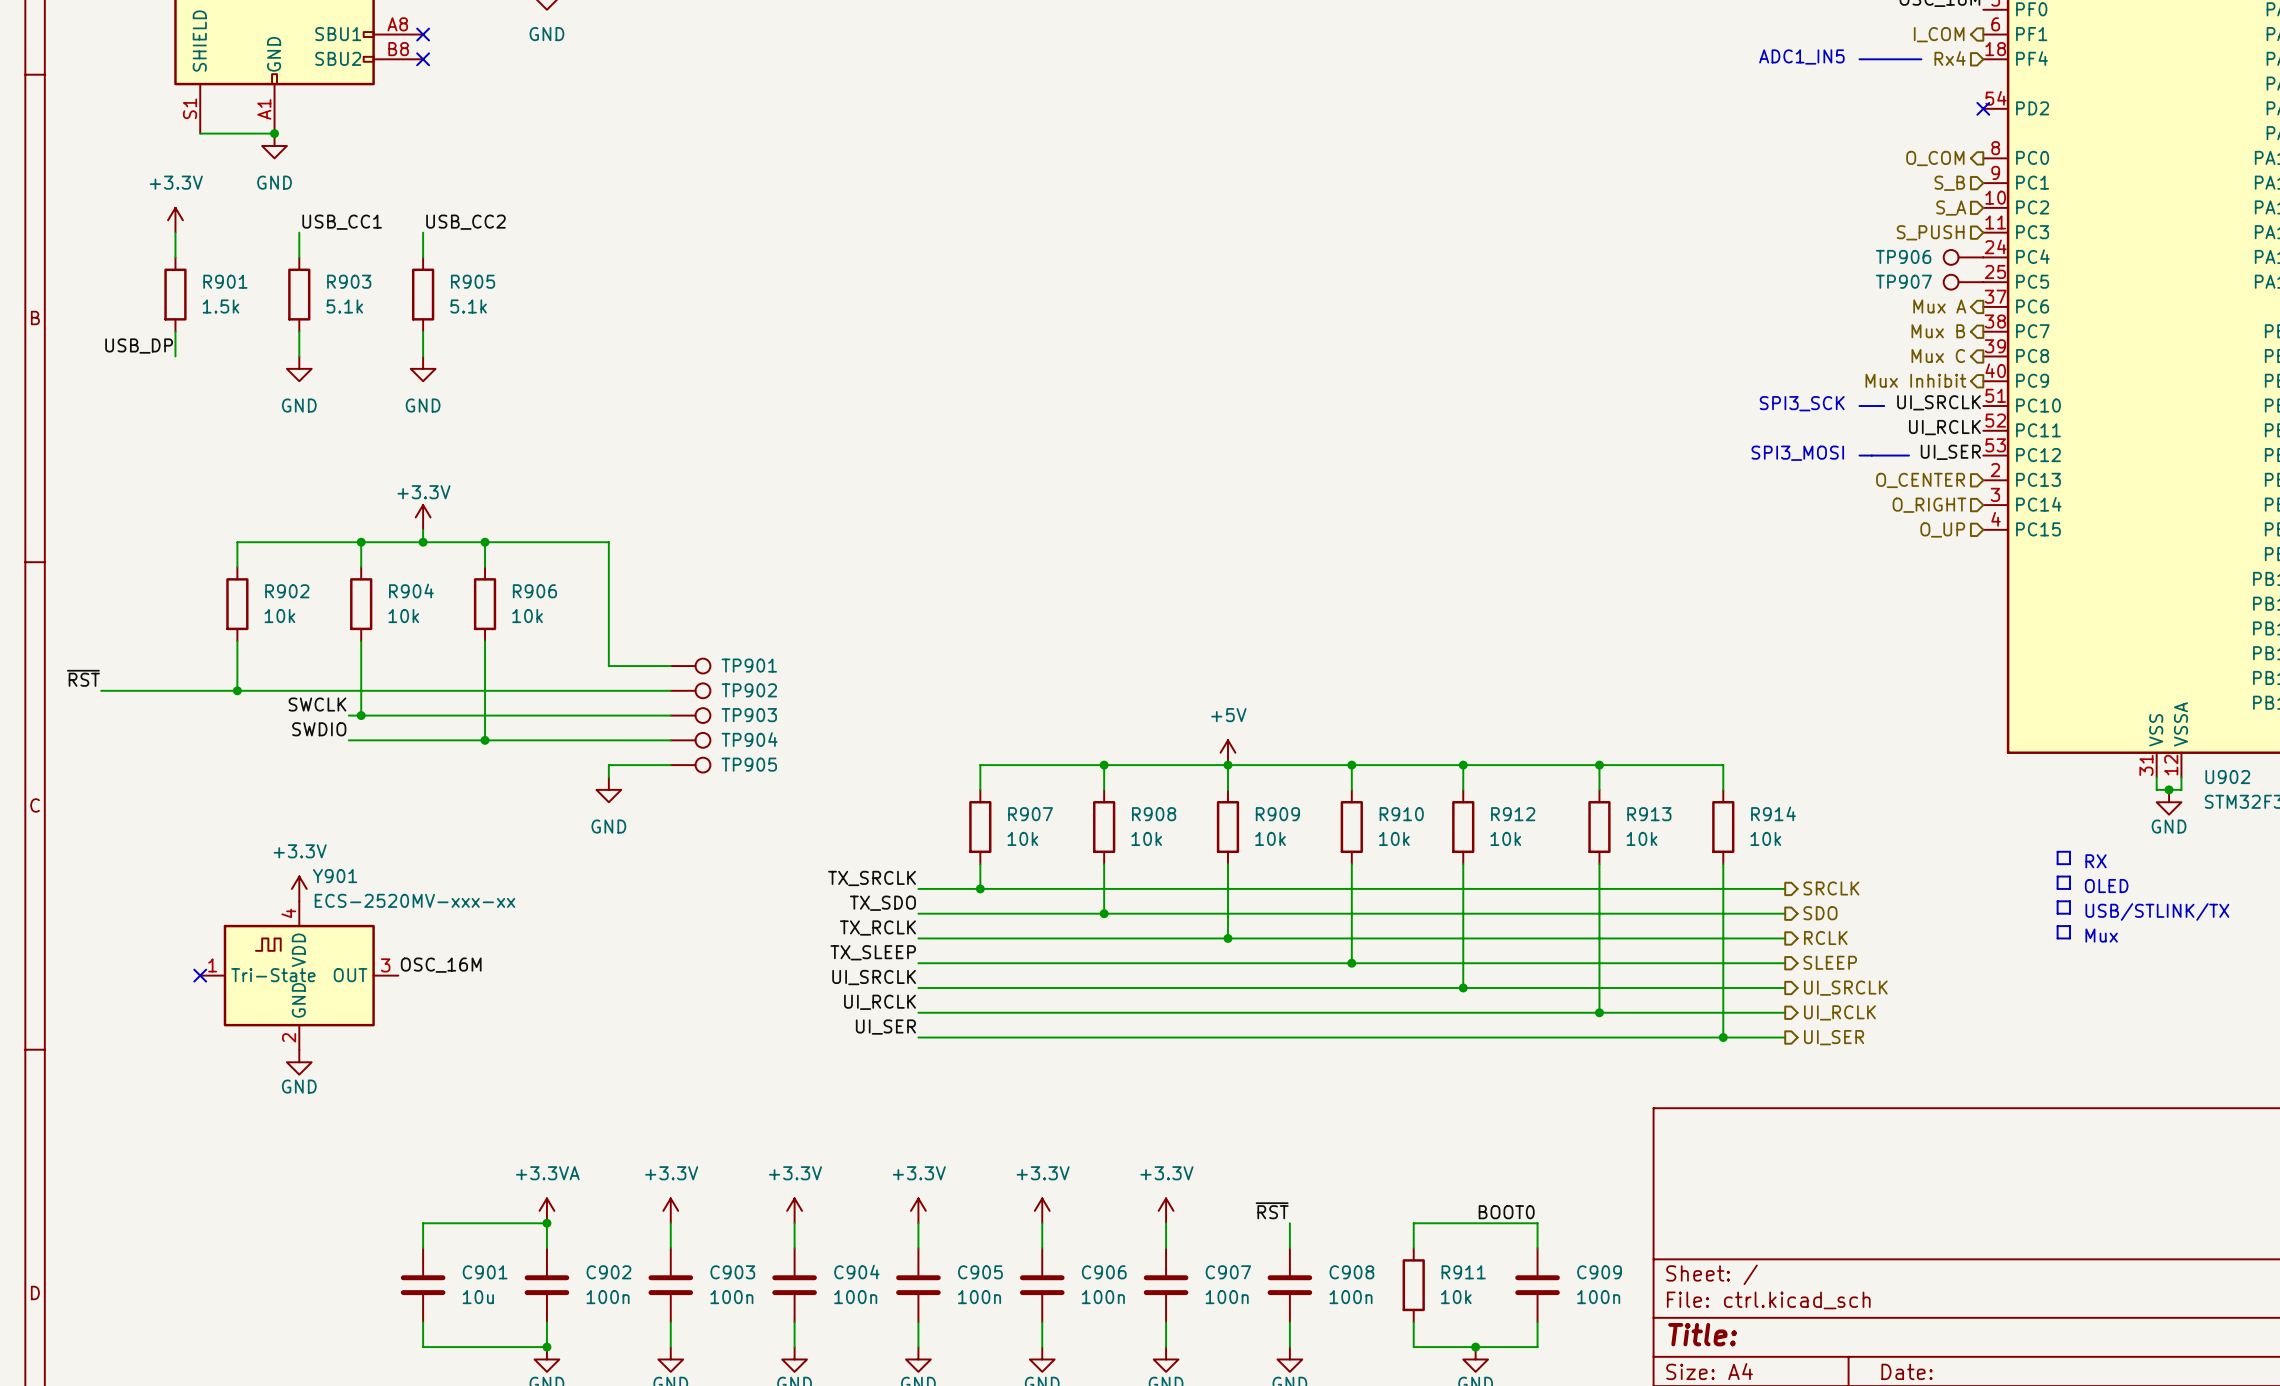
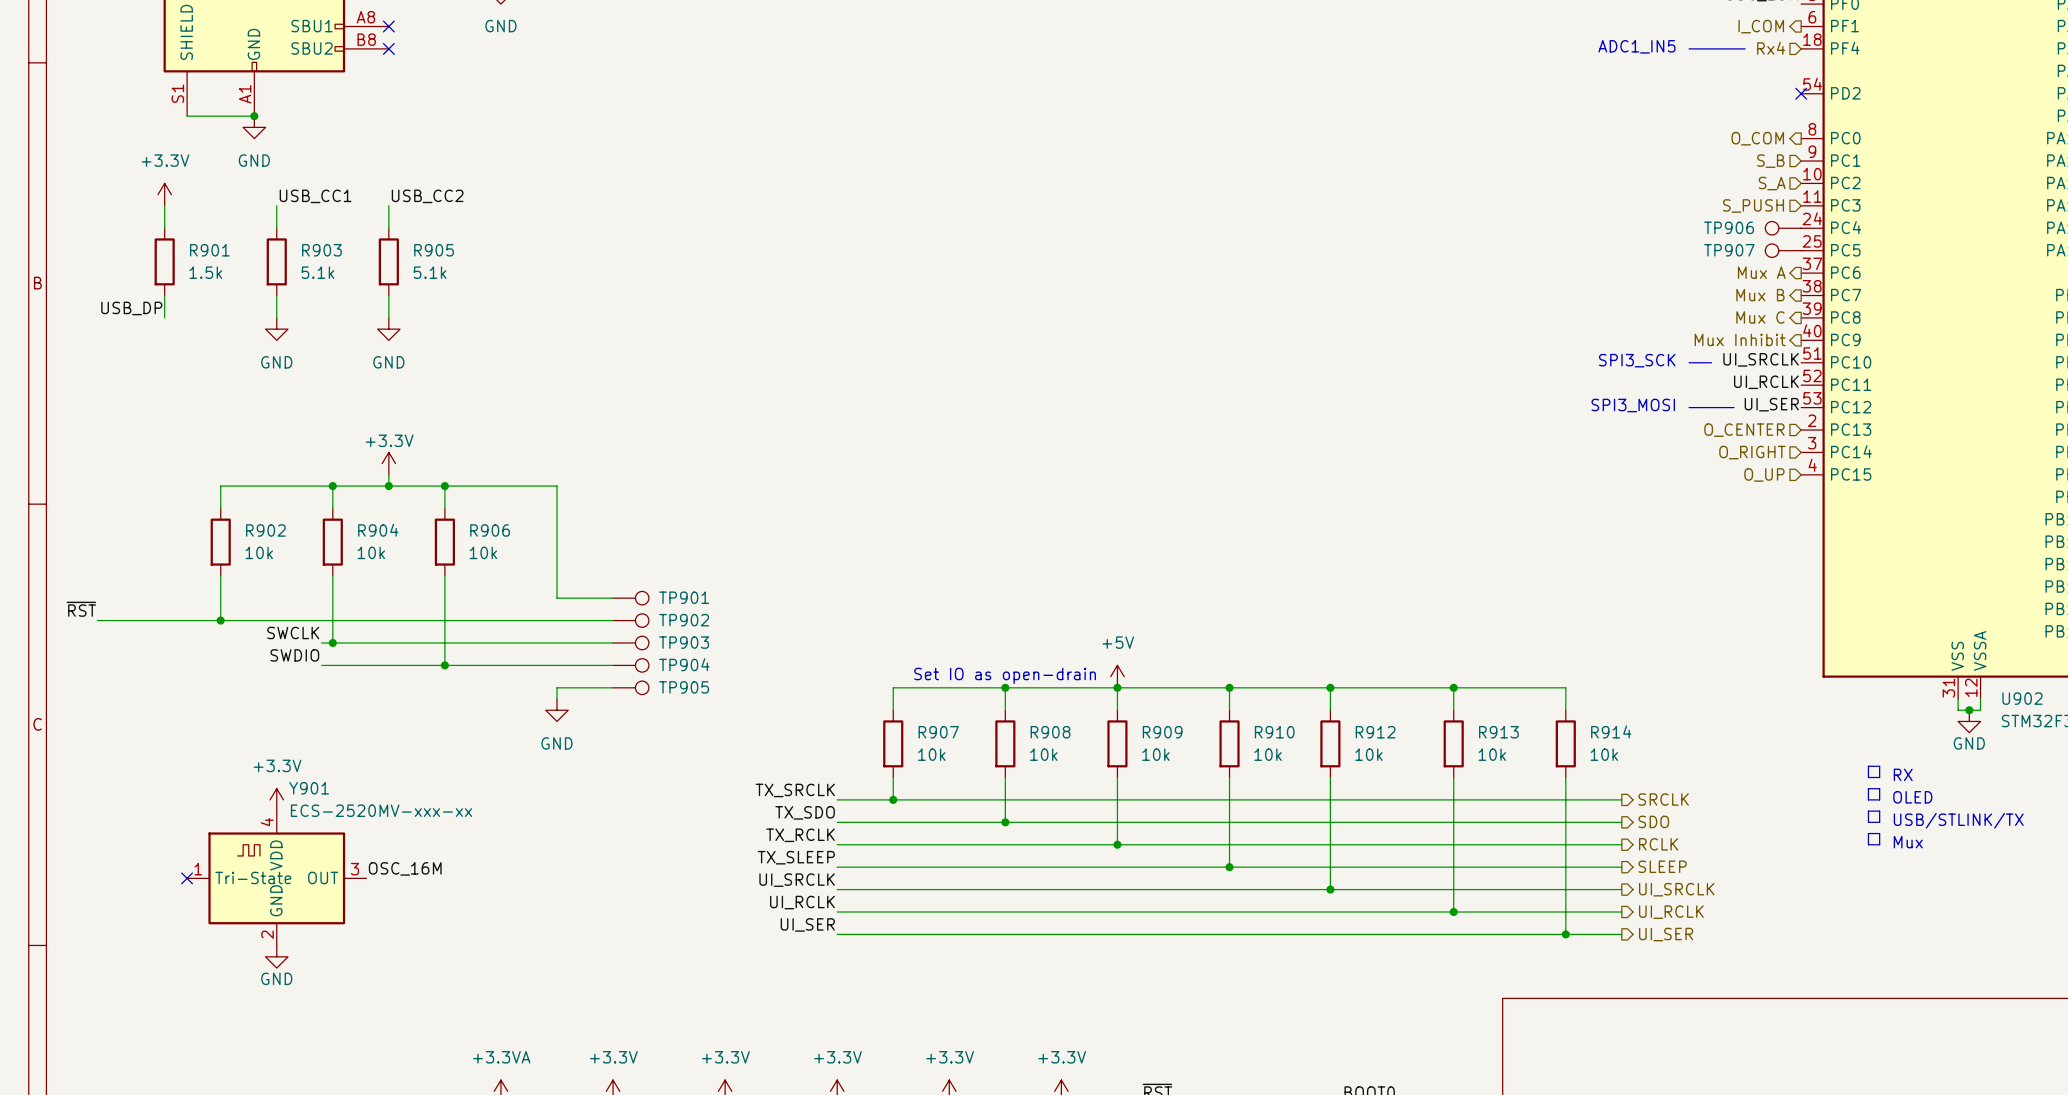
text: none -> Set IO as open-drain (1005, 675)

